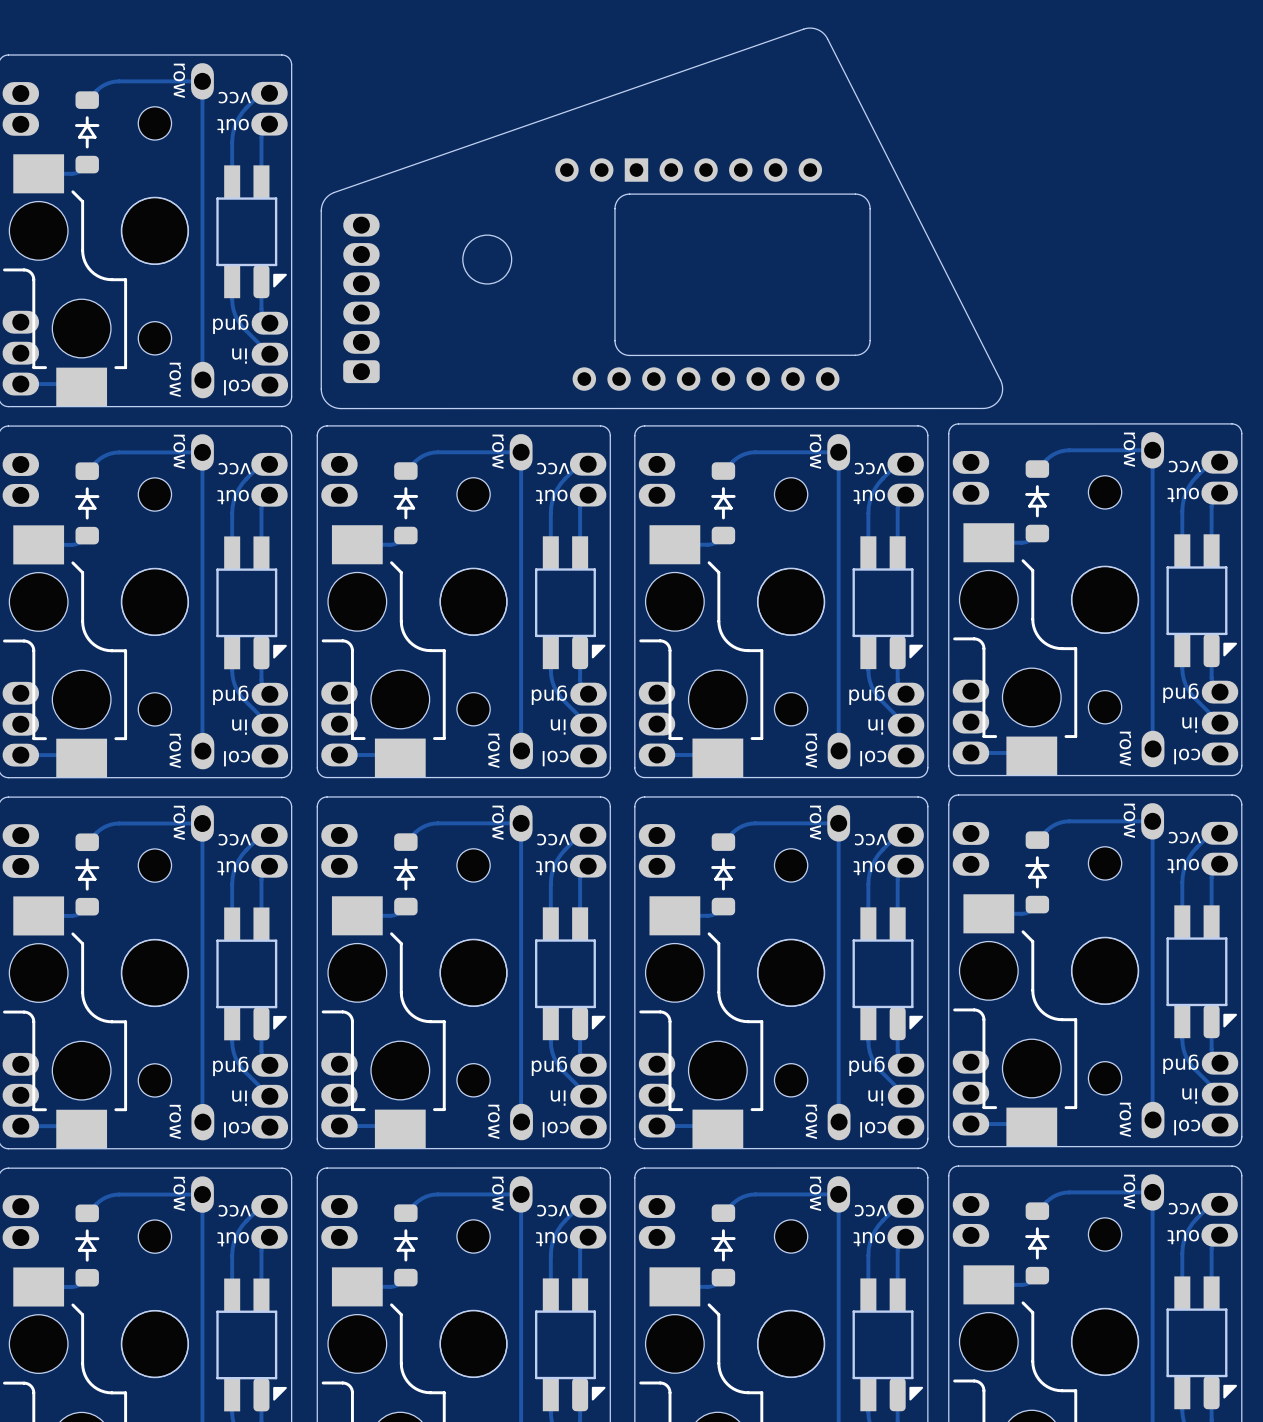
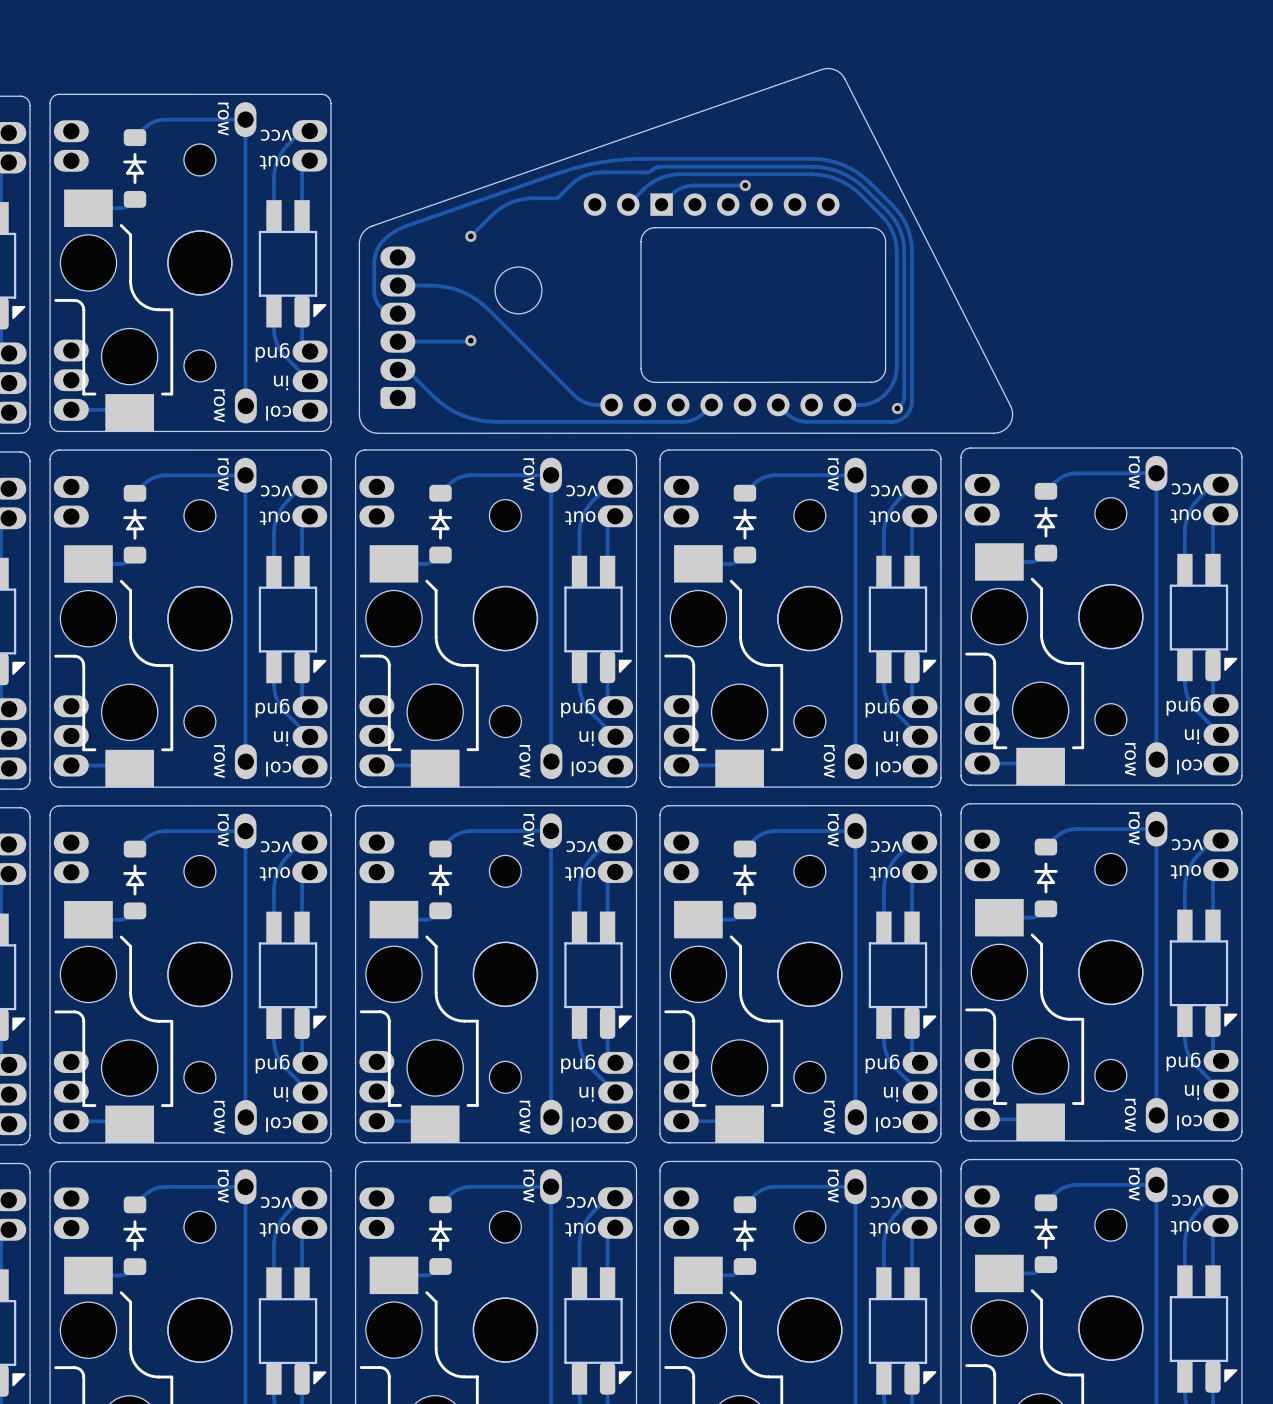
track: none -> (745, 185) (687, 186) (676, 190) (661, 204)
via: none -> (745, 185)
track: none -> (557, 198) (573, 182) (588, 174) (646, 172) (658, 166) (819, 167) (840, 172) (853, 179) (892, 216) (899, 229) (903, 244) (904, 396) (902, 402) (897, 408)
track: none -> (557, 198) (527, 198) (510, 202) (496, 211) (470, 236)
track: none -> (628, 204) (655, 180) (680, 174) (817, 174) (837, 179) (860, 195) (888, 223) (895, 242) (896, 370) (890, 388) (879, 399) (866, 404) (844, 405)
via: none -> (470, 236)
track: none -> (911, 266) (910, 238) (901, 215) (863, 177) (850, 168) (835, 162) (812, 158) (614, 160) (586, 165) (558, 173) (394, 231) (380, 243) (375, 254) (374, 291) (376, 302) (383, 309) (389, 313) (397, 313)
track: none -> (911, 268) (911, 401) (910, 409) (905, 415) (899, 420) (891, 421) (803, 421) (792, 418) (778, 405)
track: none -> (397, 285) (439, 285) (454, 289) (469, 295) (487, 309) (577, 398) (589, 403) (611, 405)
track: none -> (470, 340) (397, 341)
via: none -> (470, 340)
track: none -> (397, 369) (409, 372) (439, 401) (453, 411) (469, 418) (486, 421) (686, 421) (697, 418) (711, 405)
via: none -> (897, 408)

